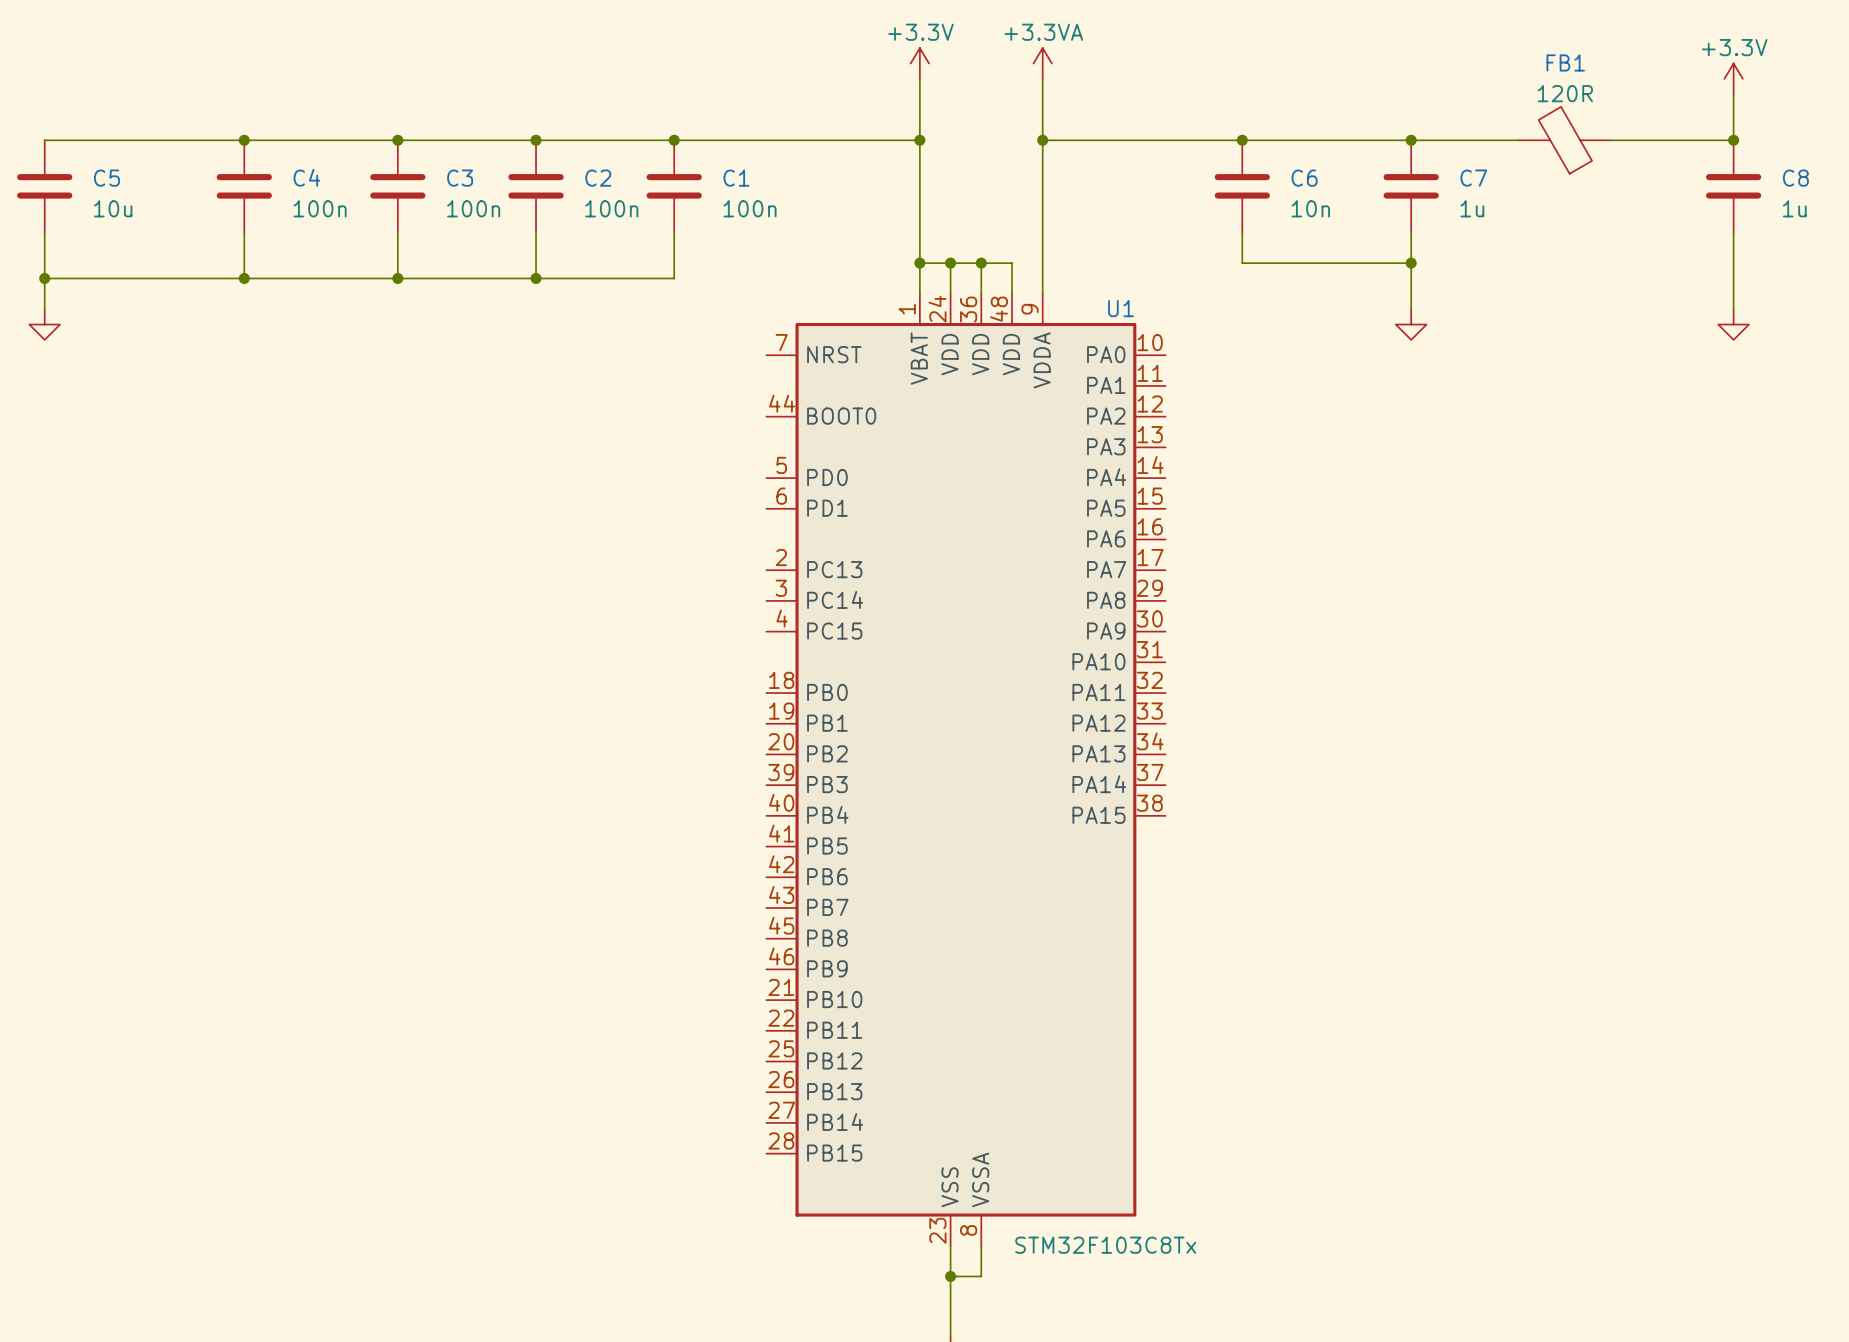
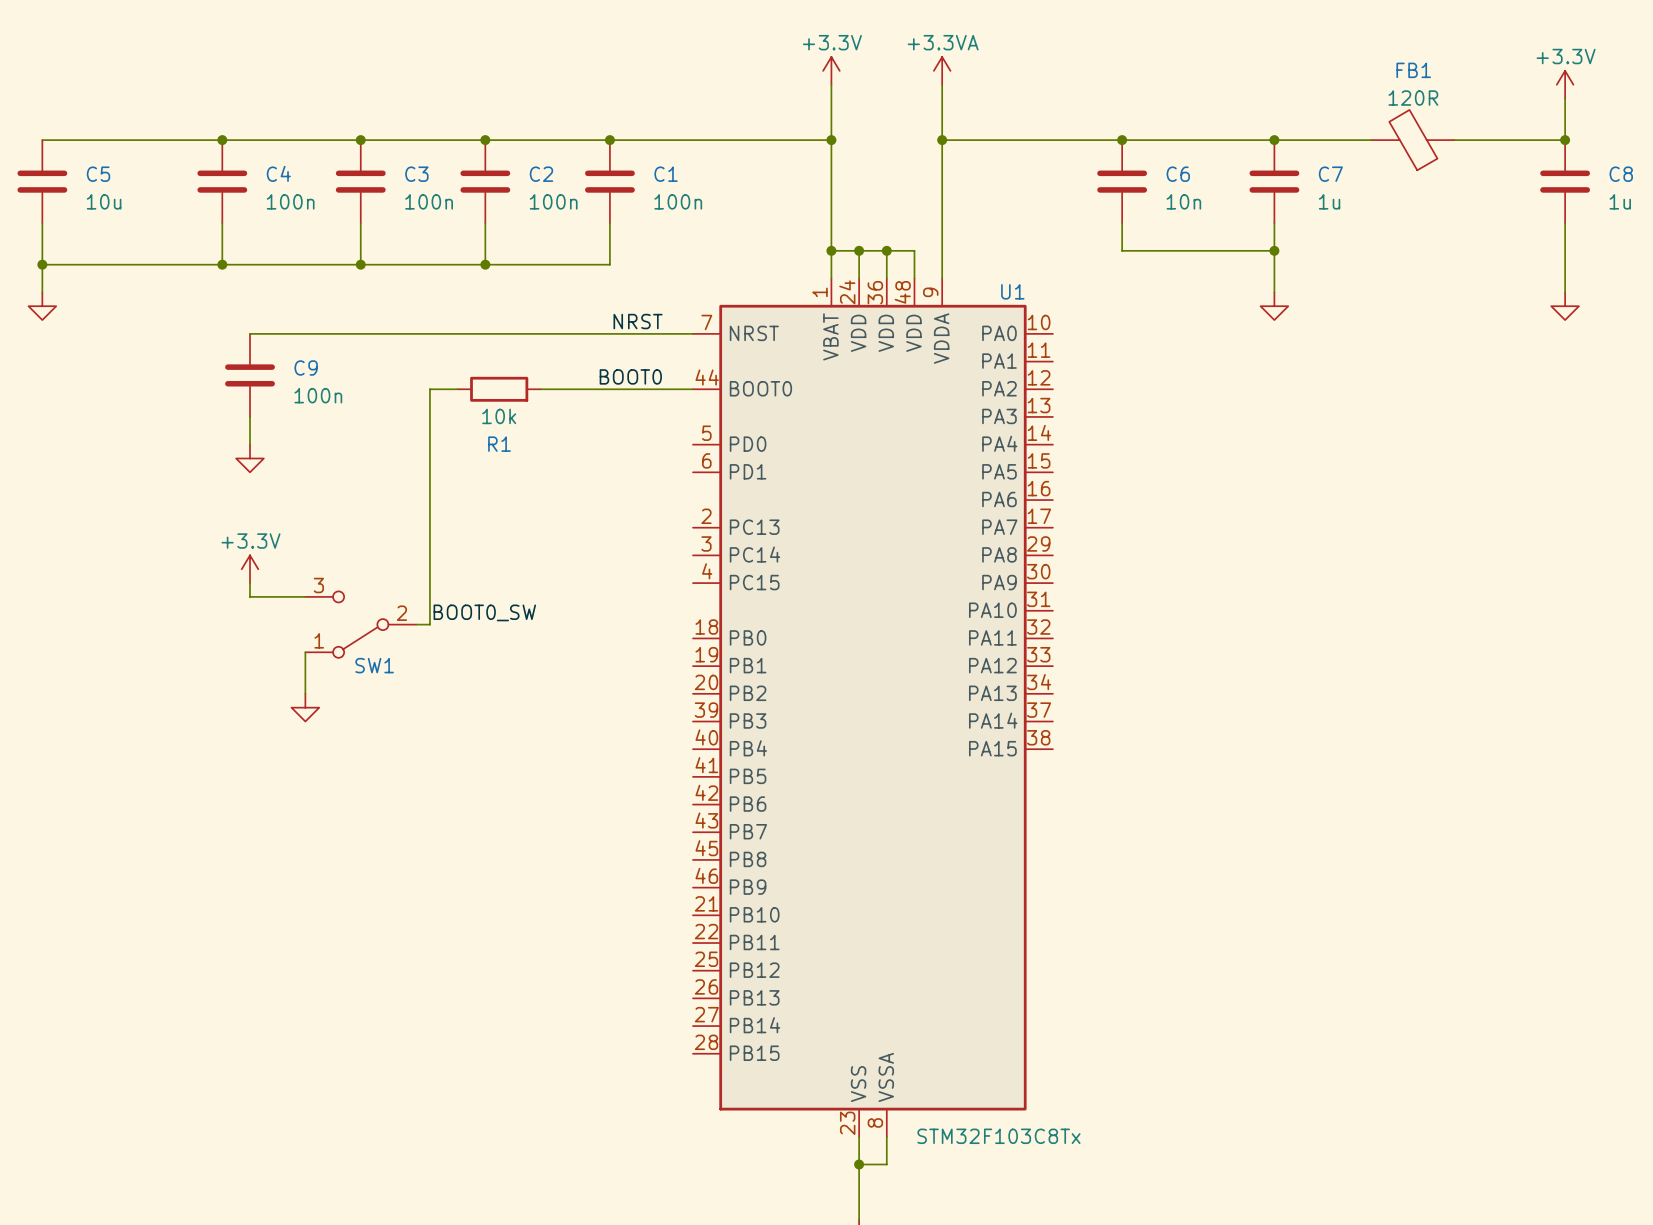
label: none -> NRST (638, 321)
wire: none -> (250, 333) (692, 333)
C9: none -> 100n (250, 375)
label: none -> BOOT0 (630, 376)
wire: none -> (457, 389) (429, 389) (429, 624) (416, 624)
R1: none -> 10k (499, 389)
wire: none -> (540, 389) (692, 389)
wire: none -> (250, 416) (250, 444)
power symbol: none -> (250, 458)
power symbol: none -> +3.3V (250, 569)
wire: none -> (250, 583) (250, 596) (305, 596)
label: none -> BOOT0_SW (484, 612)
SW1: none -> (360, 624)
wire: none -> (305, 652) (305, 693)
power symbol: none -> (305, 707)

